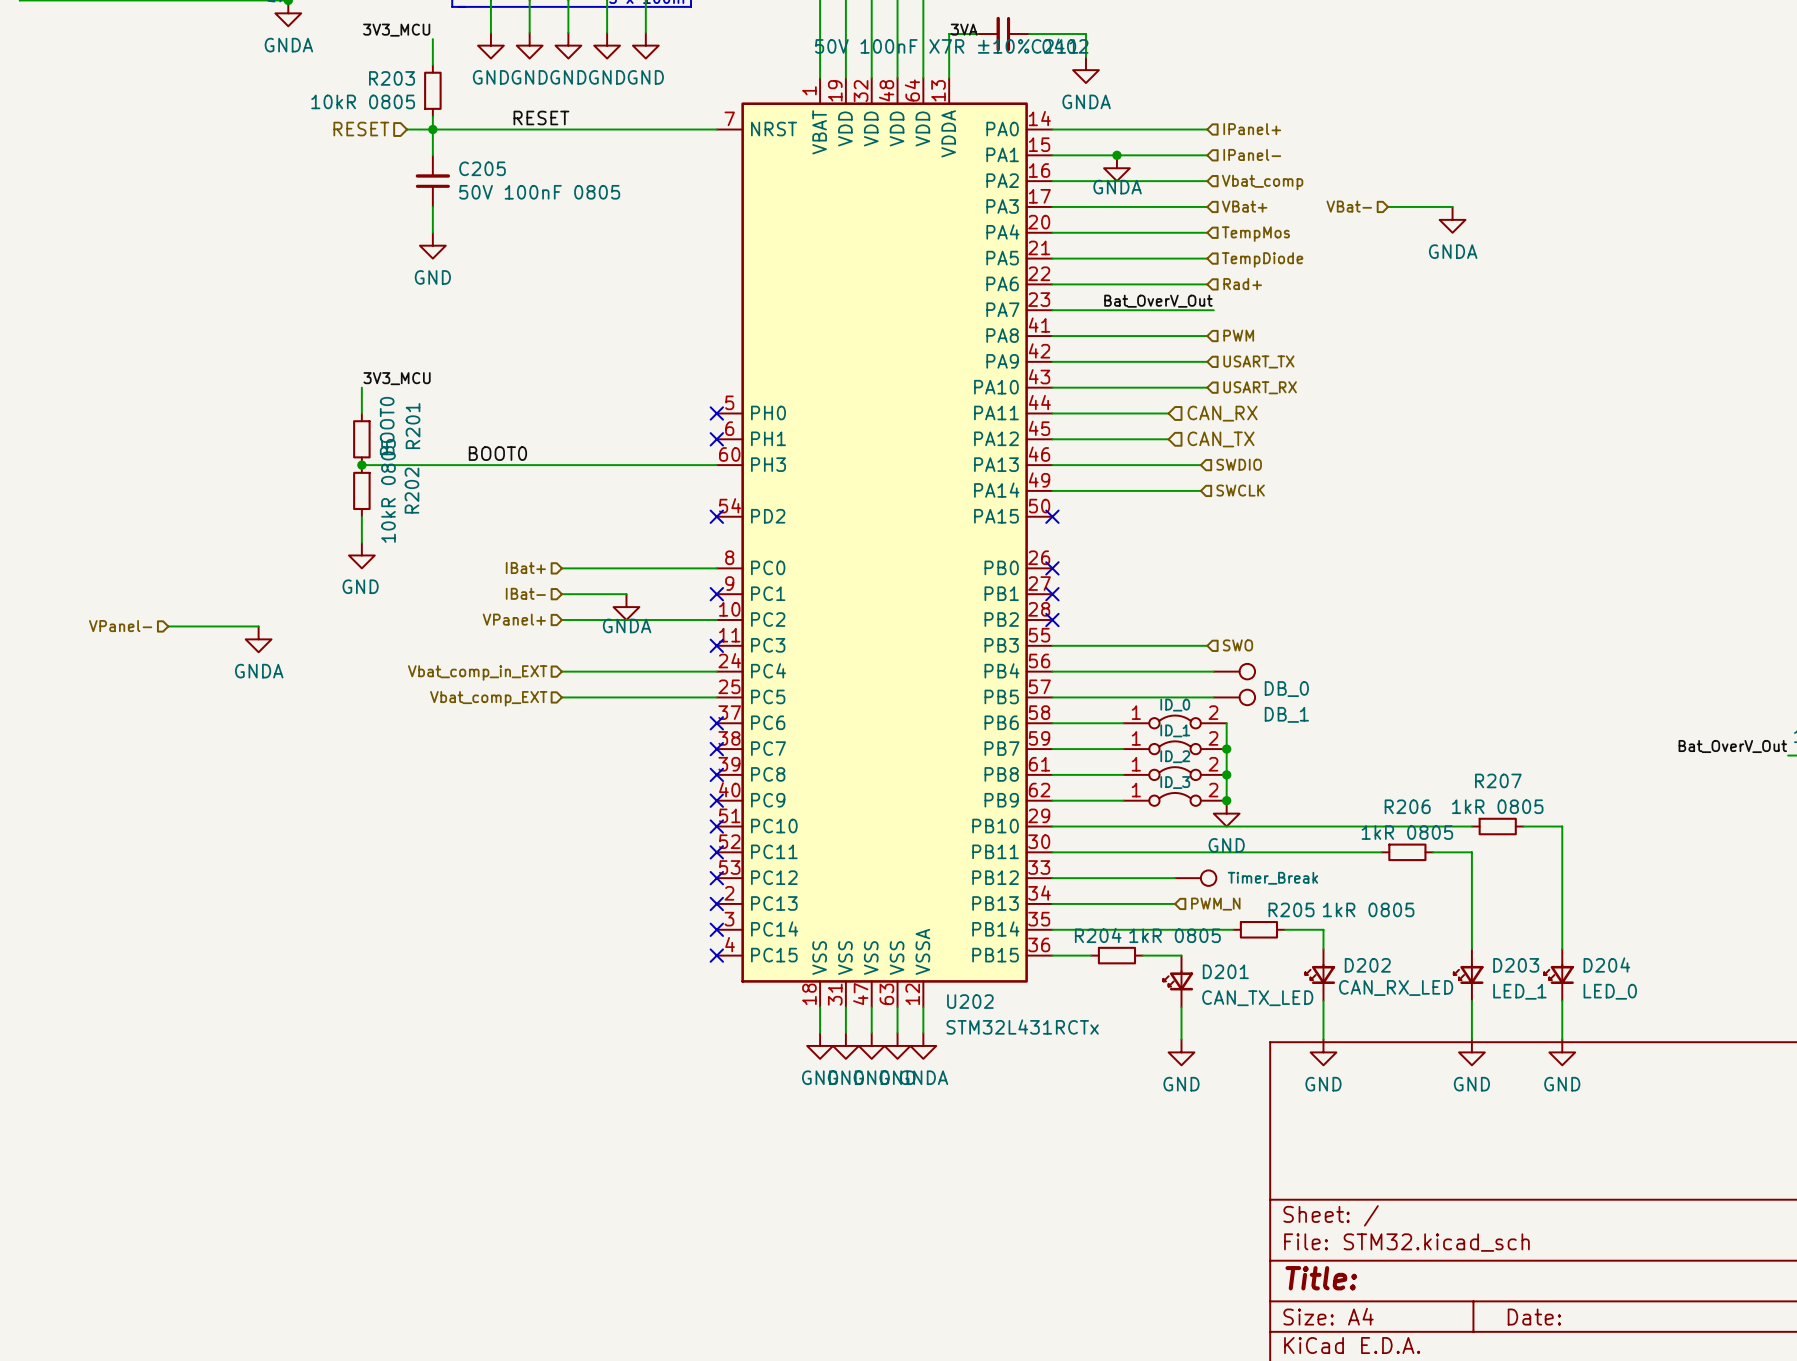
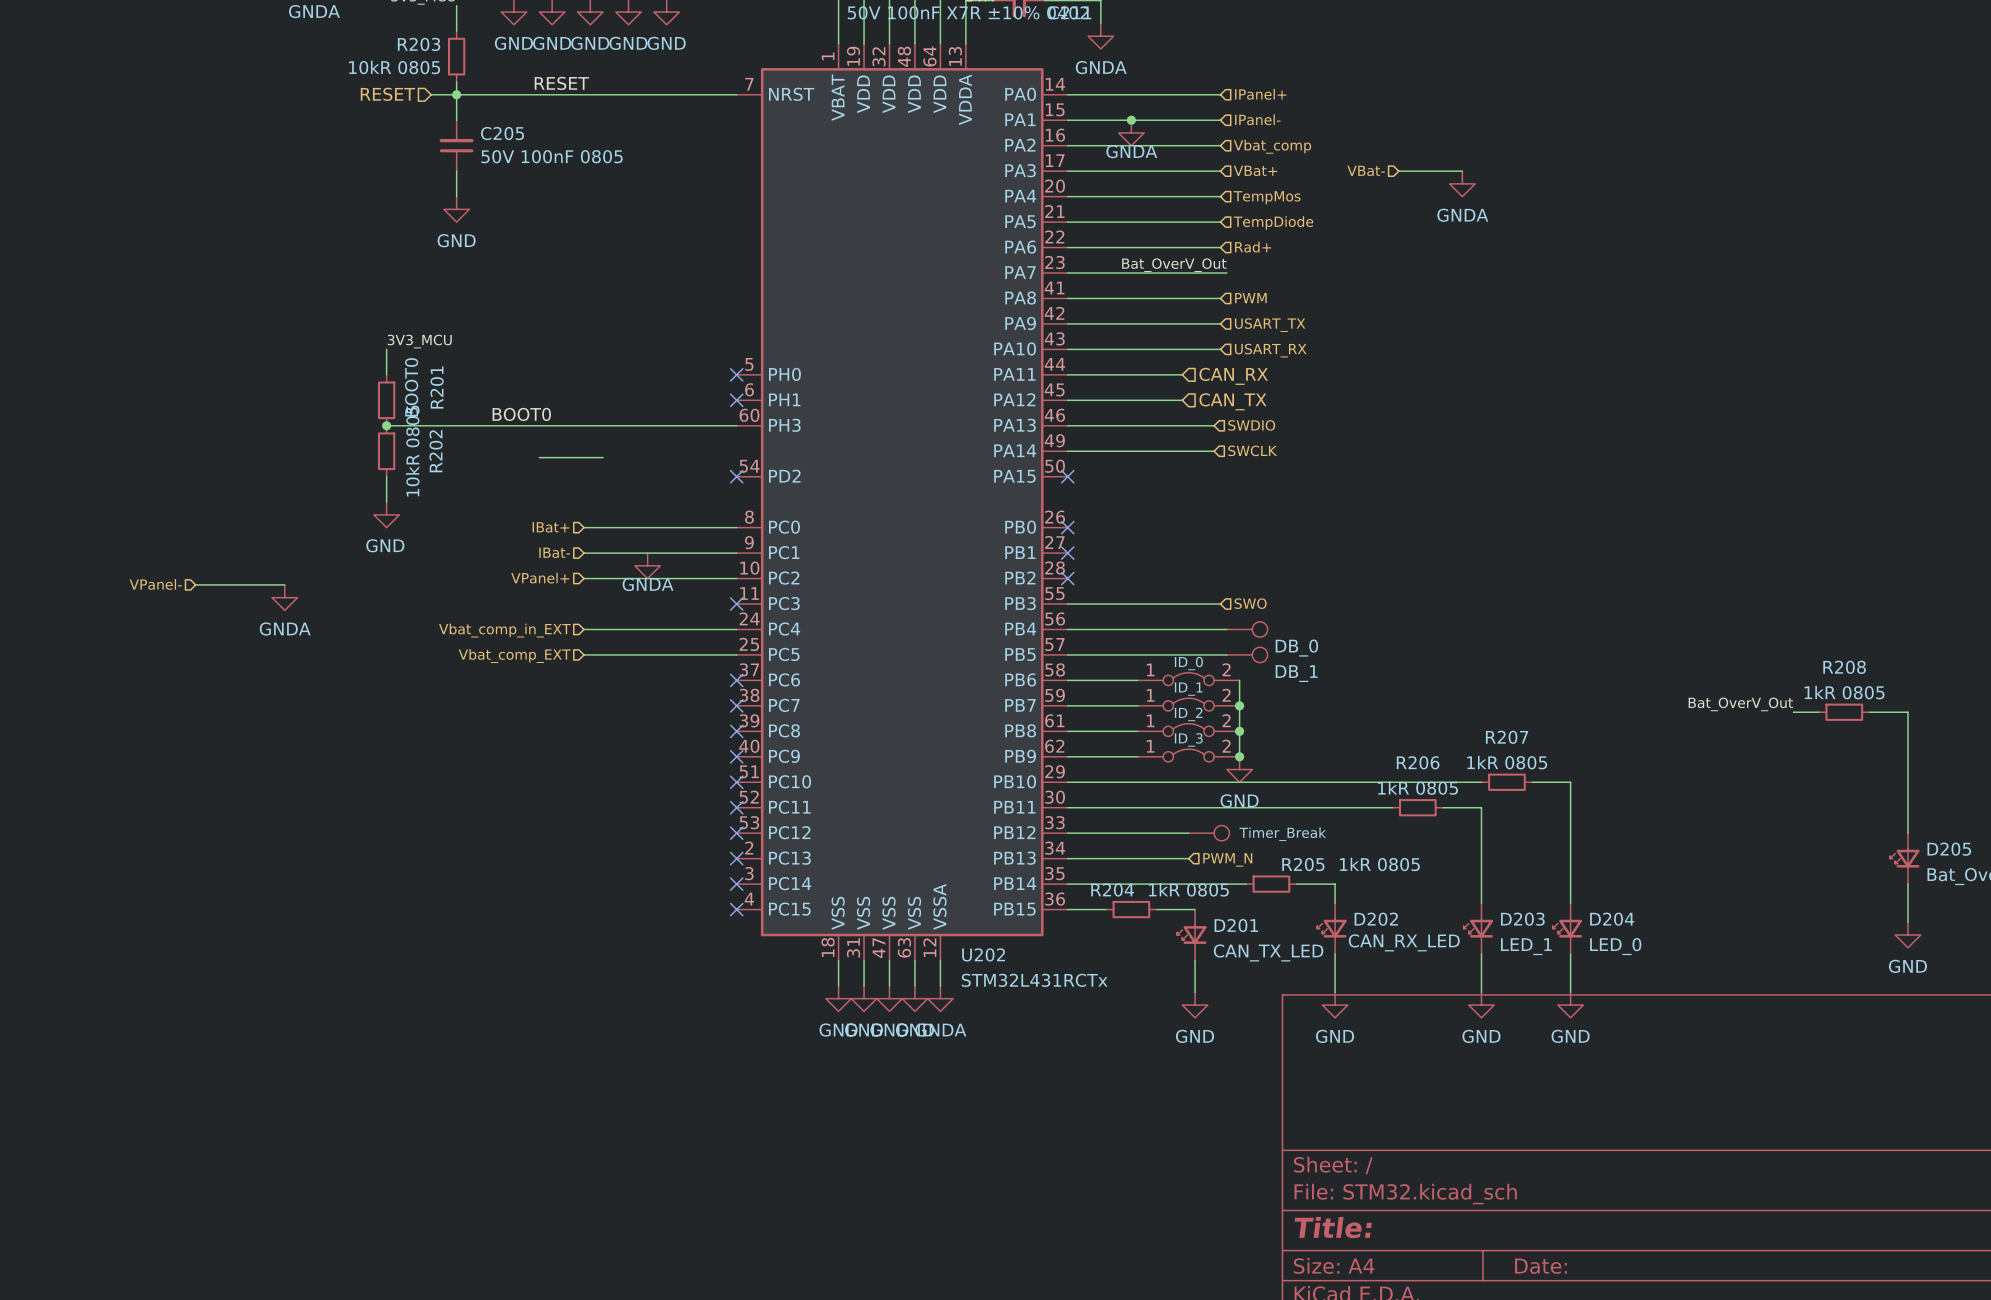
wire: none -> (539, 457) (603, 457)
wire: none -> (647, 553) (736, 553)
no-connect mark: (716, 594) -> none

